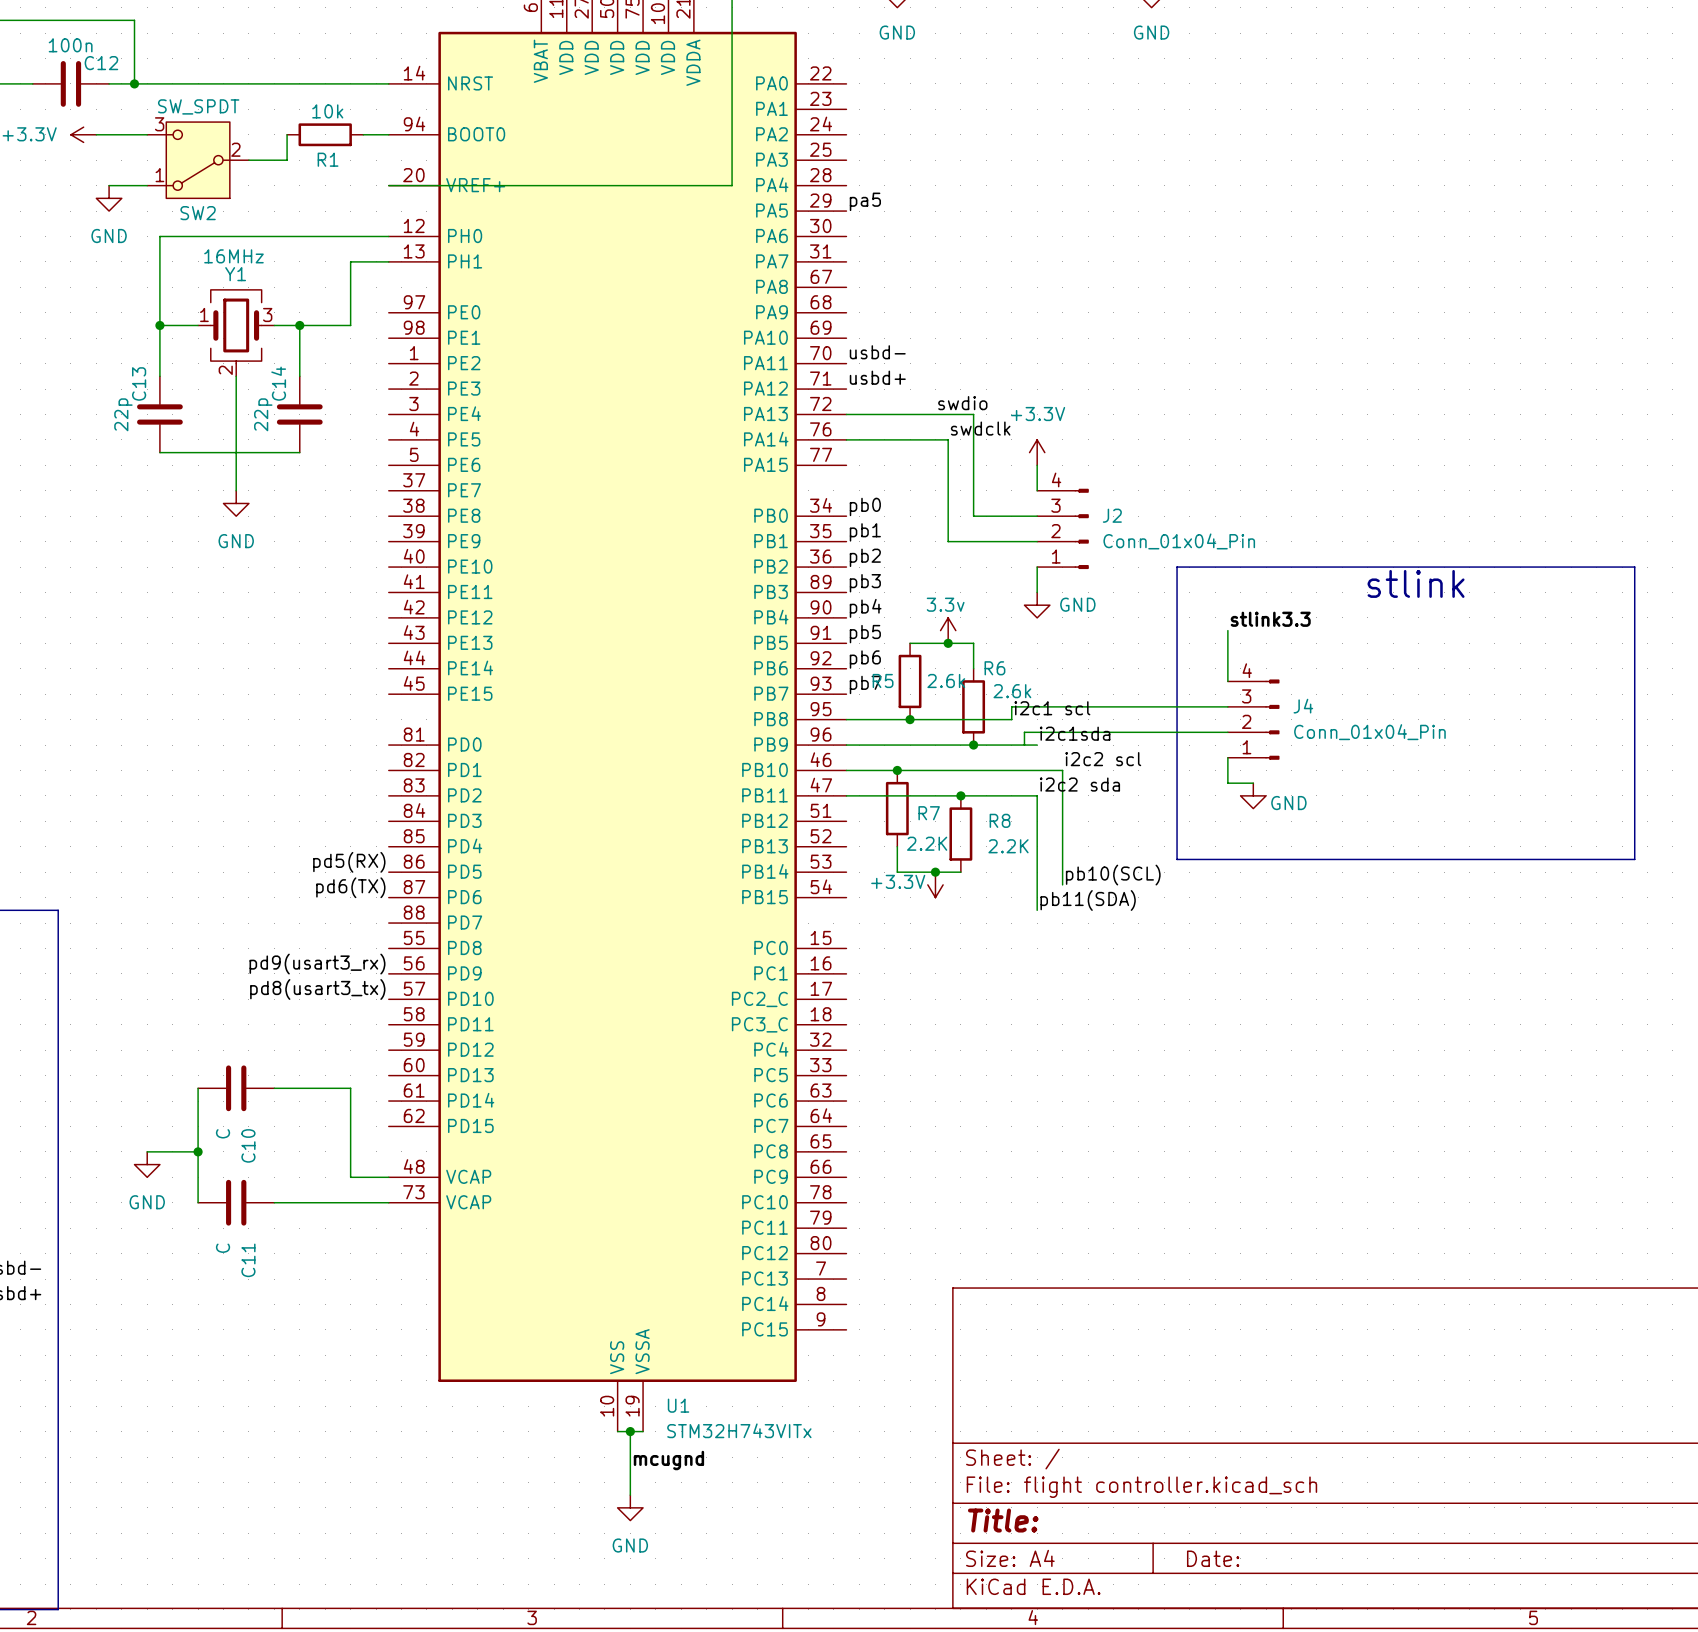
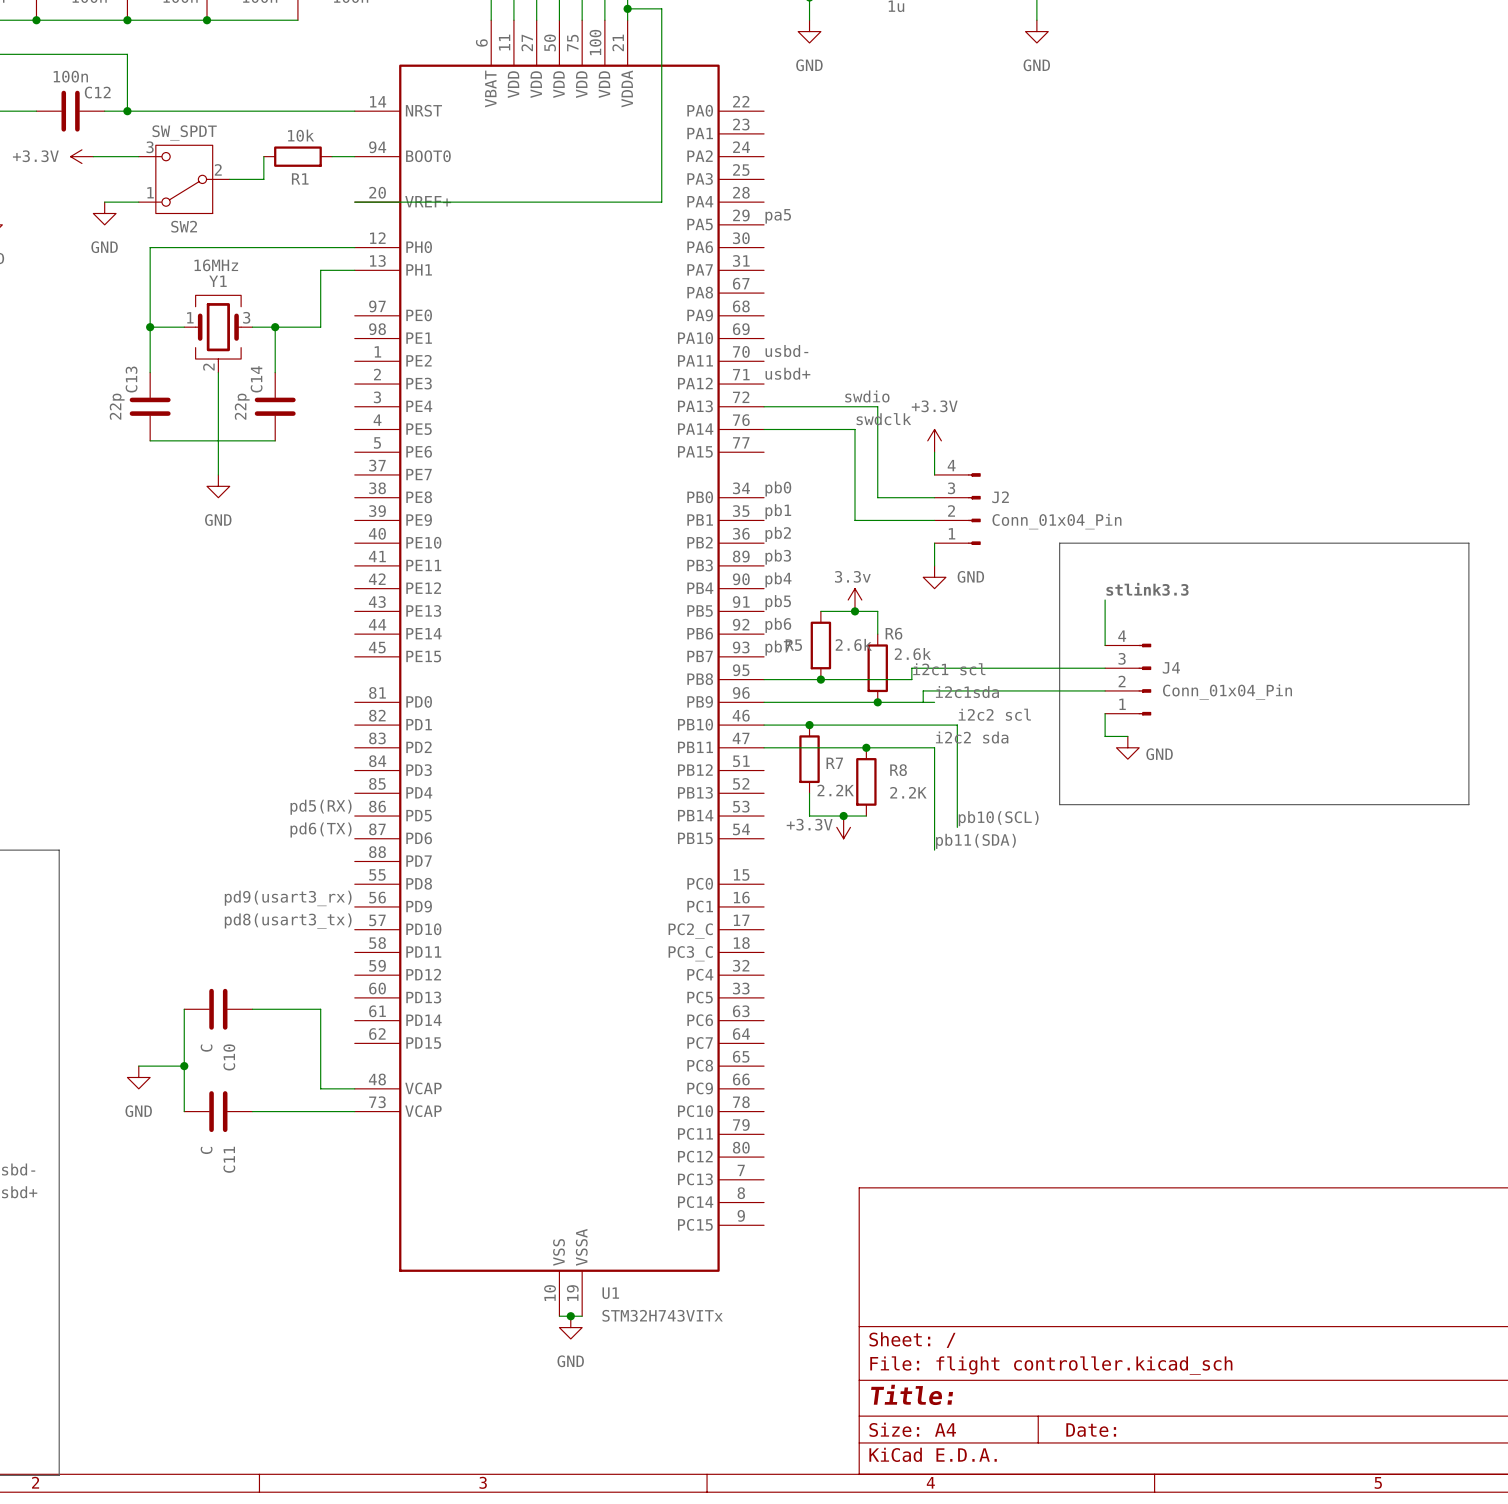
text: stlink (1416, 583) -> none
wire: (630, 1431) (630, 1495) -> none
label: mcugnd (668, 1460) -> none
power symbol position: GND (630, 1507) -> GND (570, 1327)

